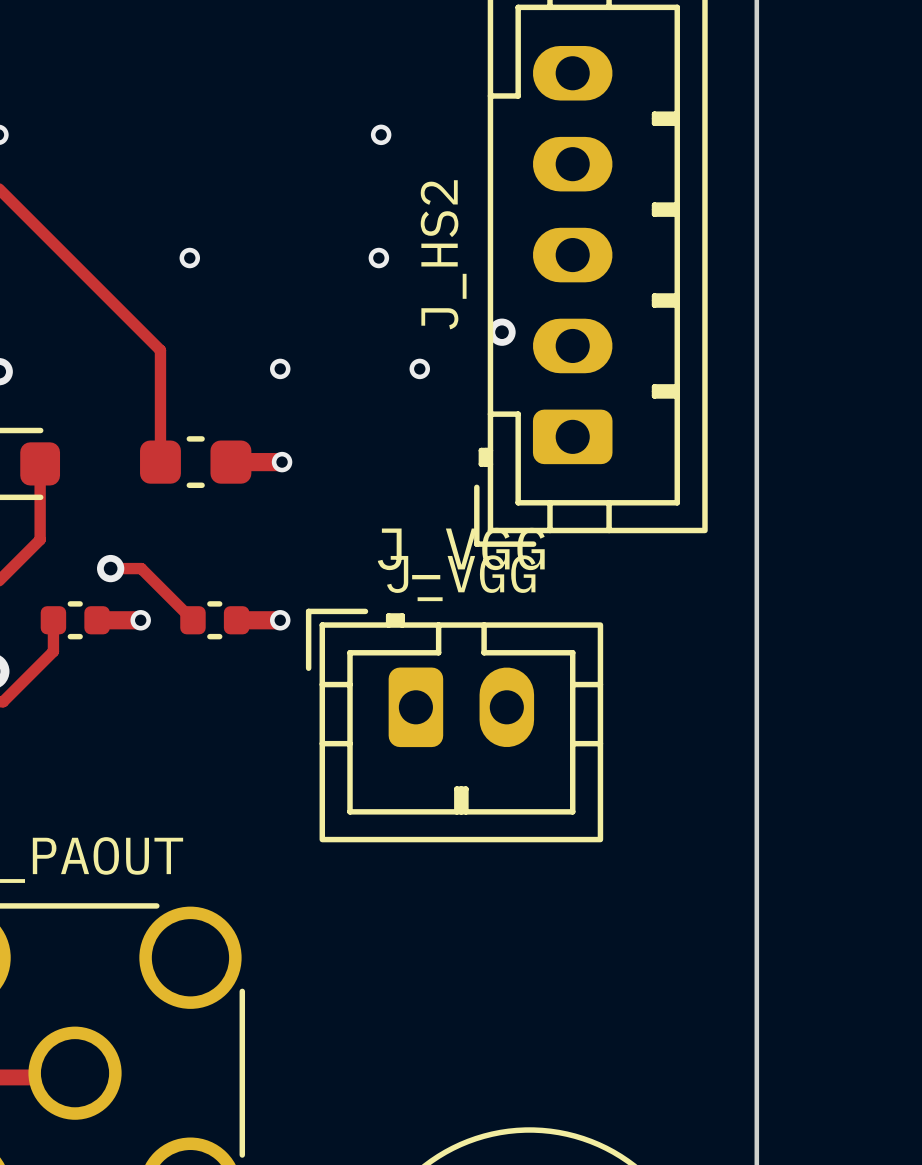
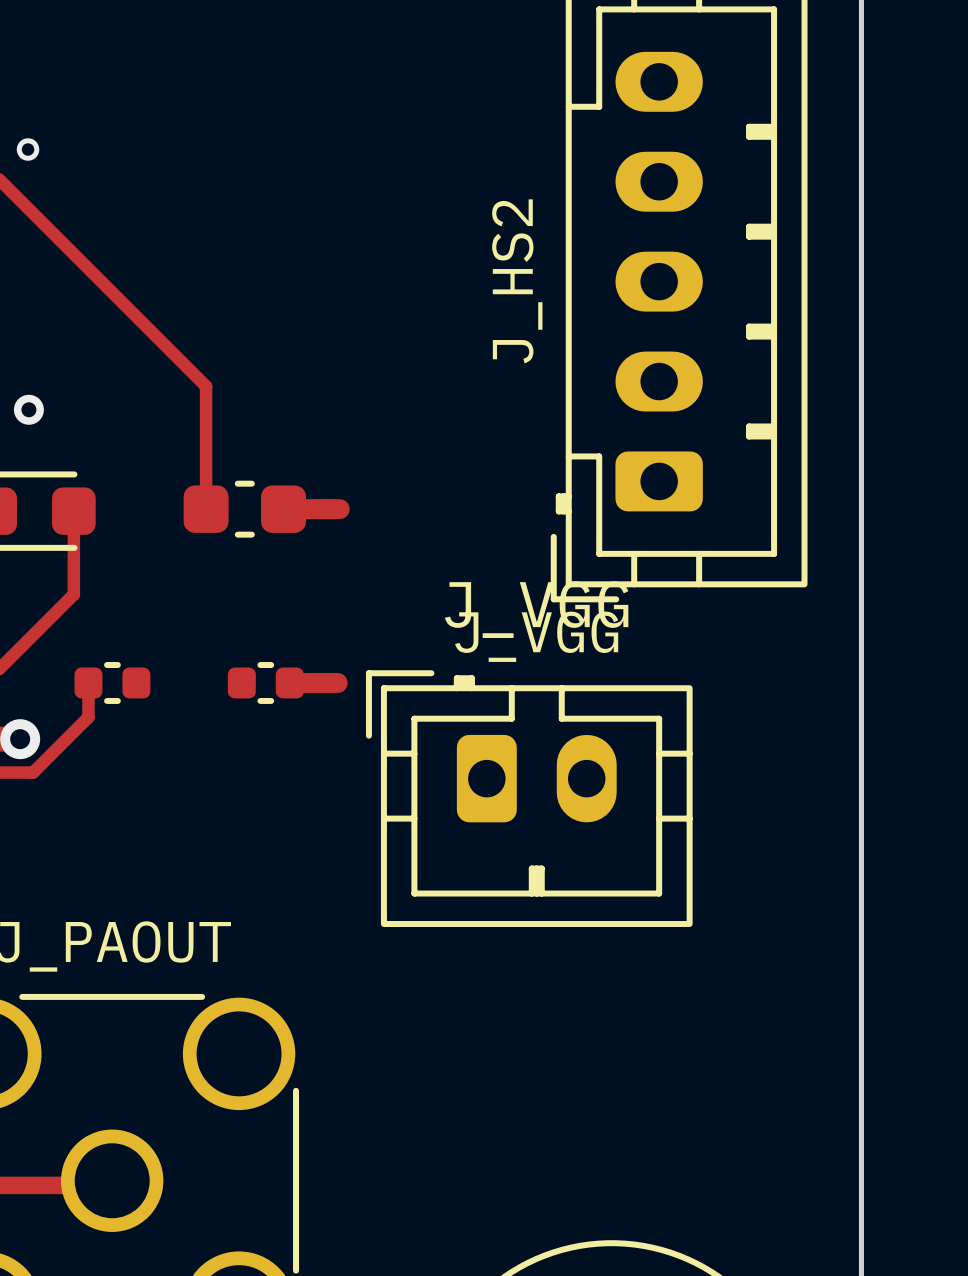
via: (381, 134) -> none
via: (189, 258) -> none
via: (378, 258) -> none
via: (502, 332) -> none
via: (280, 368) -> none
via: (419, 368) -> none
via: (282, 462) -> none
track: (110, 568) (141, 568) (192, 620) -> none
via: (110, 568) -> none
track: (97, 620) (140, 620) -> none
via: (140, 620) -> none
via: (280, 620) -> none

